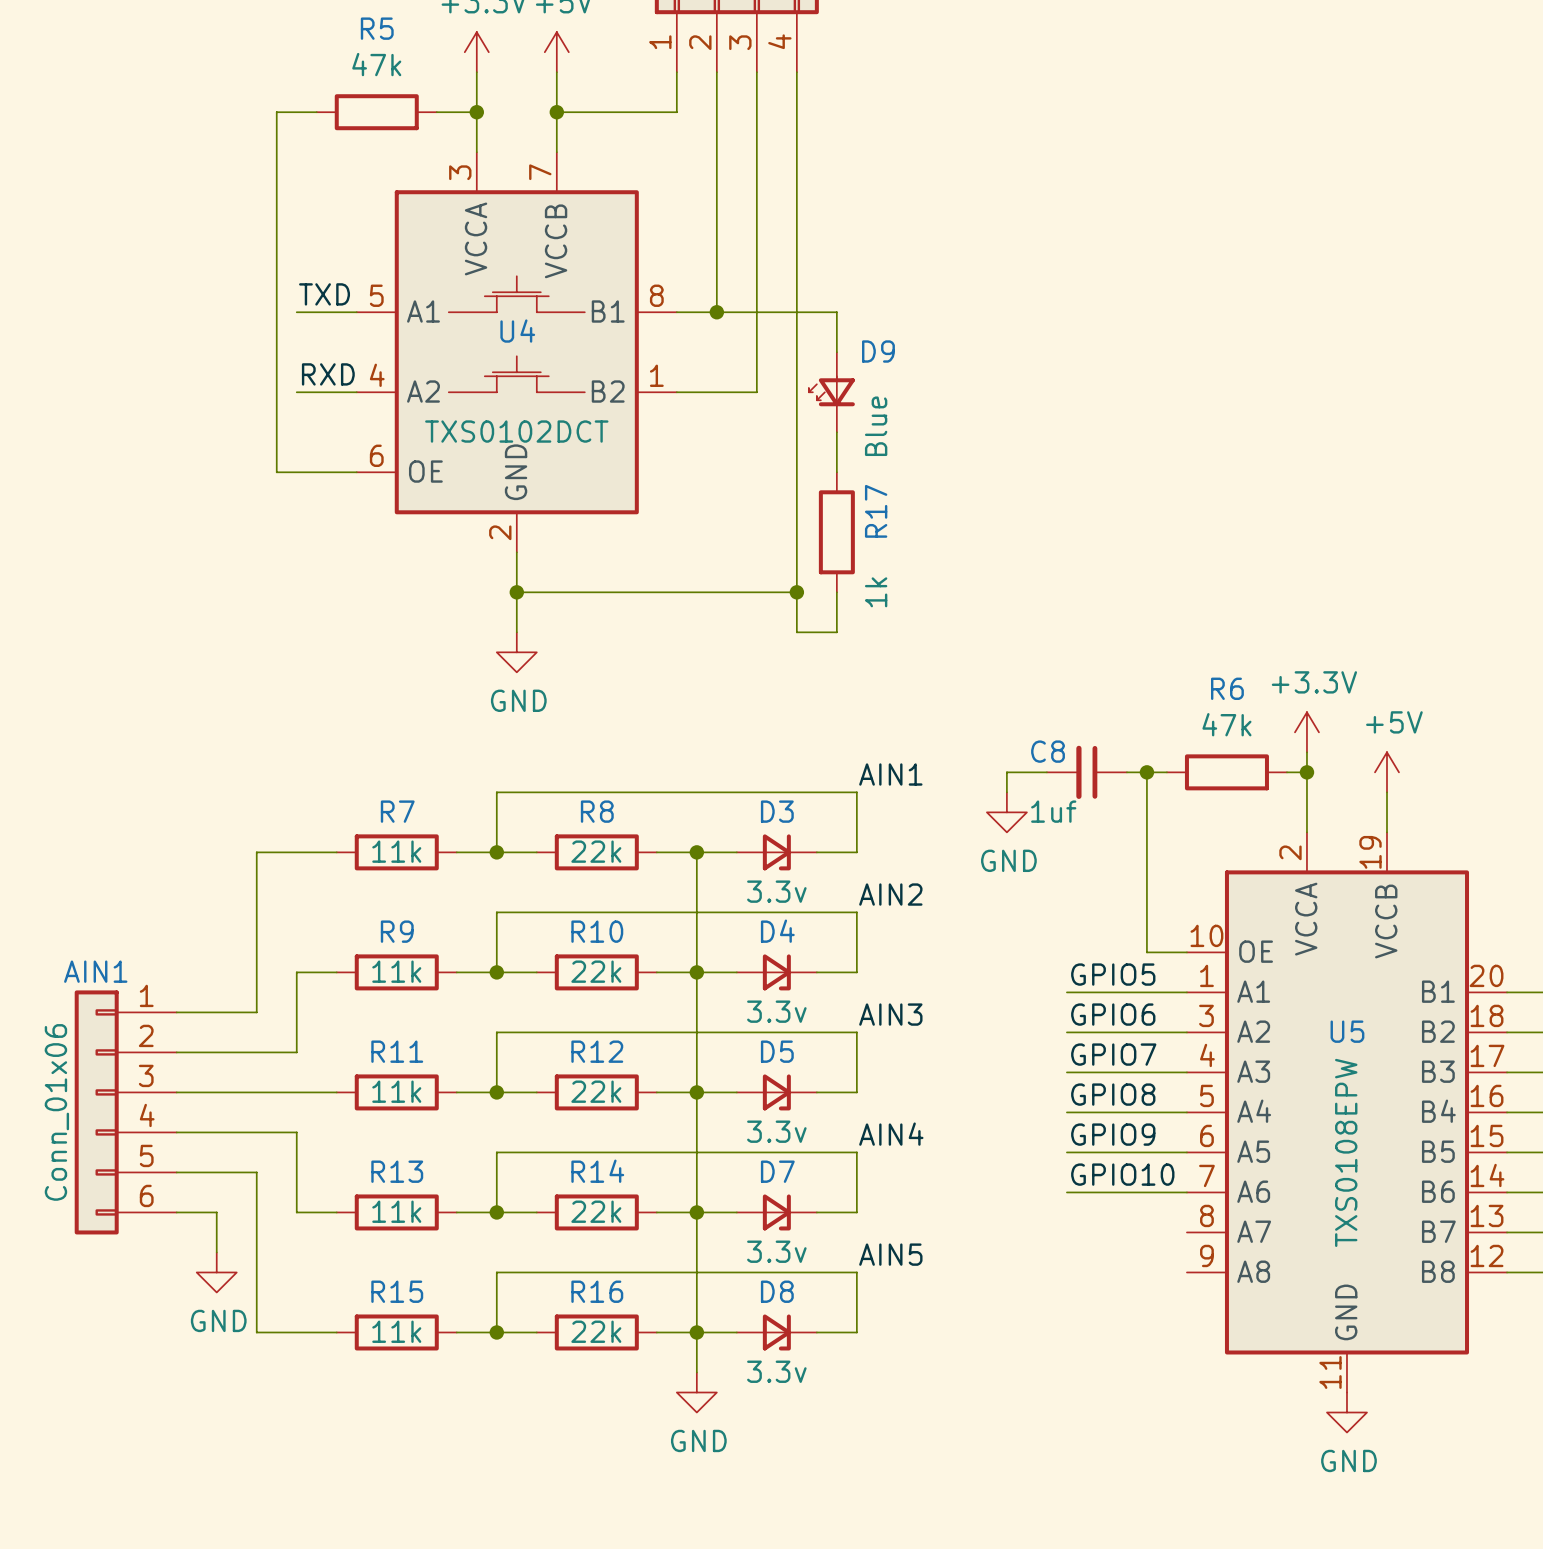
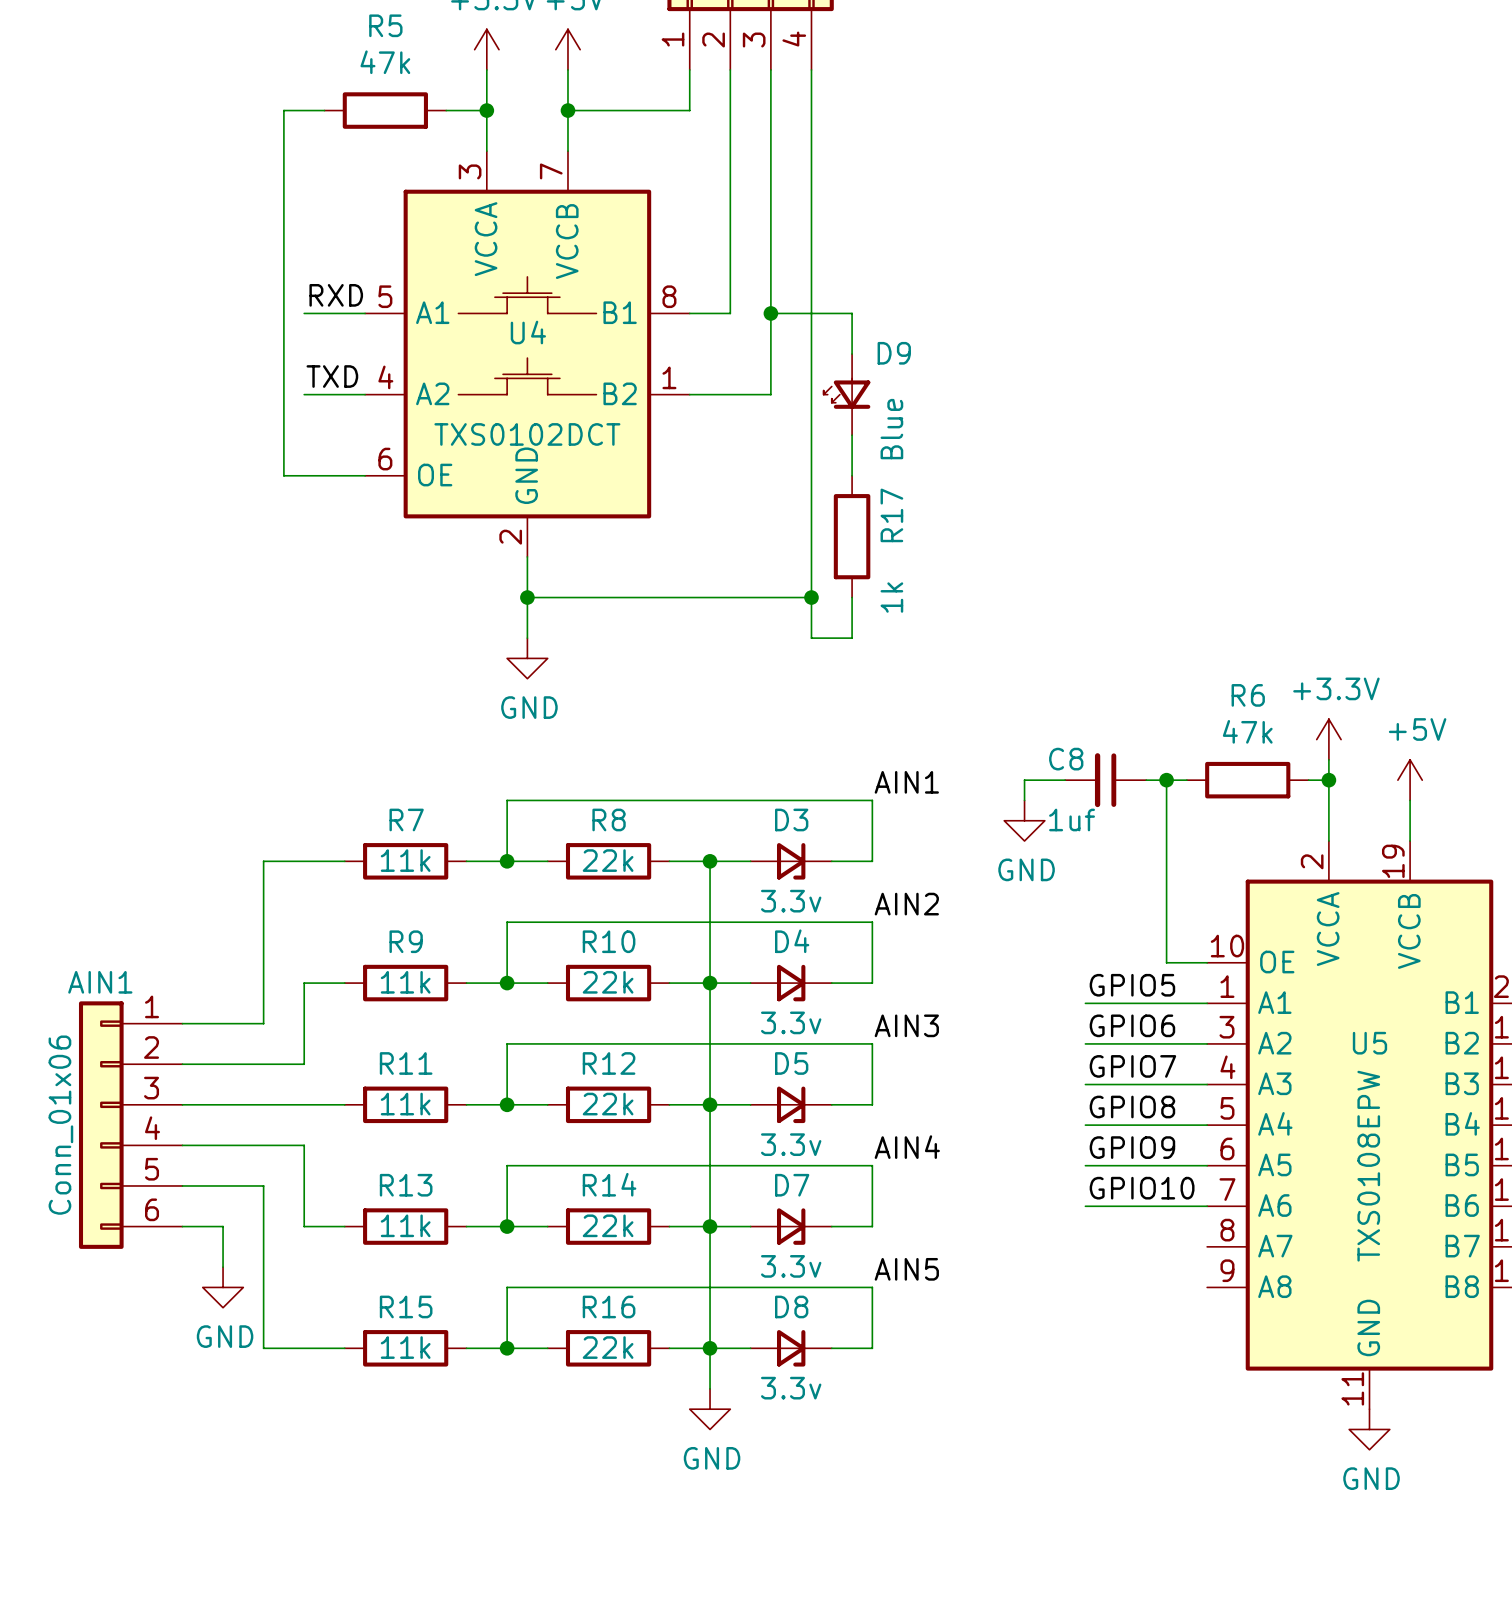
label: TXD (324, 294) -> RXD (336, 295)
wire: (716, 312) (756, 312) -> none
junction position: (716, 312) -> (770, 313)
label: RXD (328, 374) -> TXD (332, 376)

